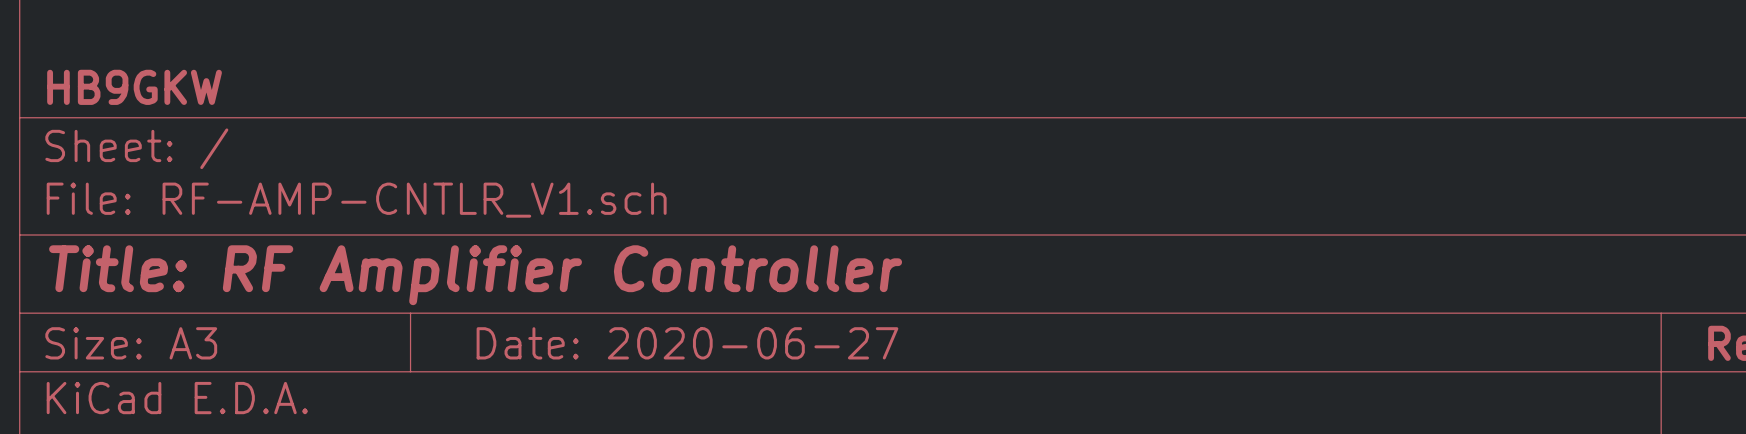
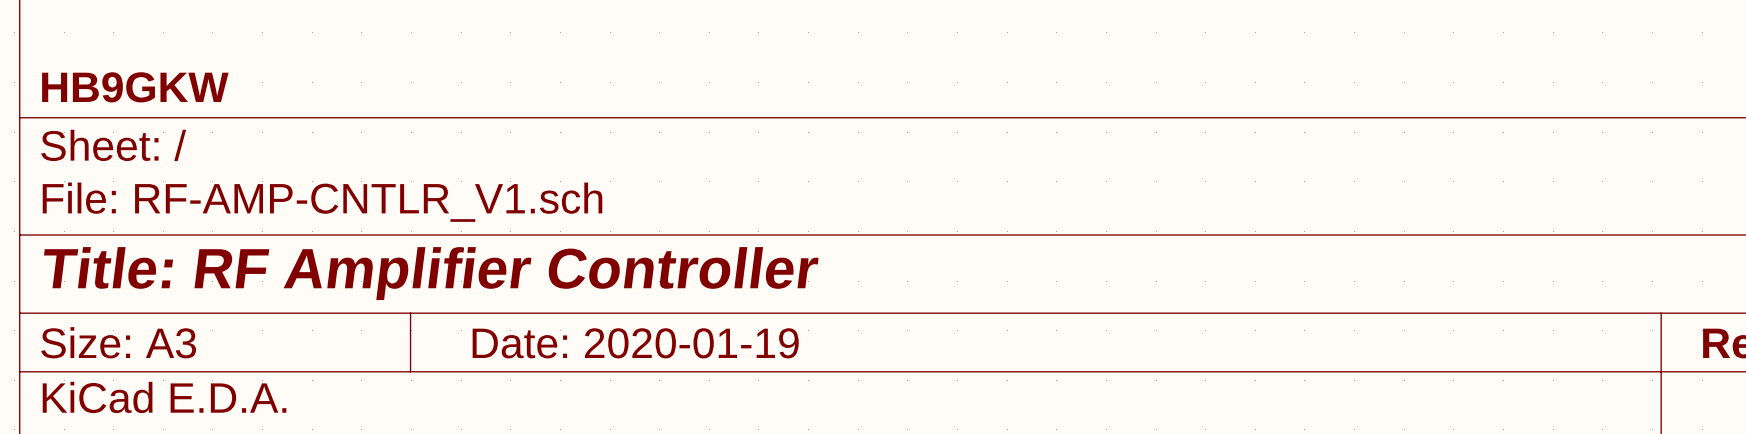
title block: Date: 2020-06-27 (687, 343) -> Date: 2020-01-19 (635, 343)

